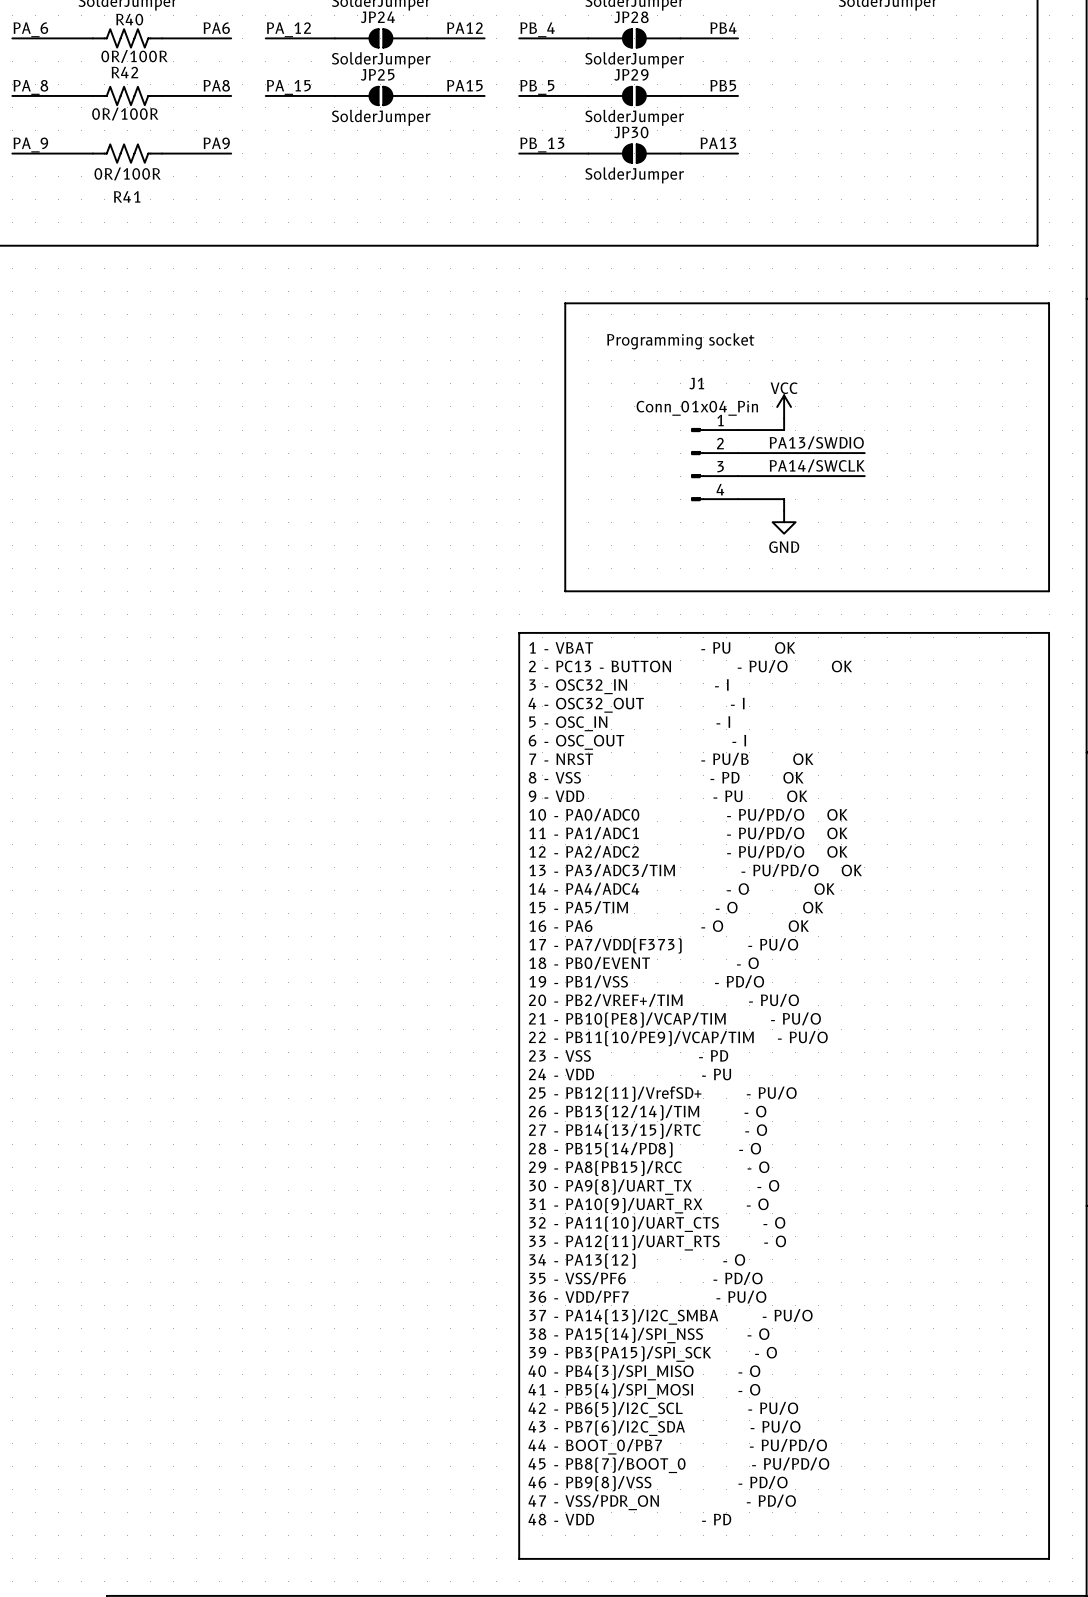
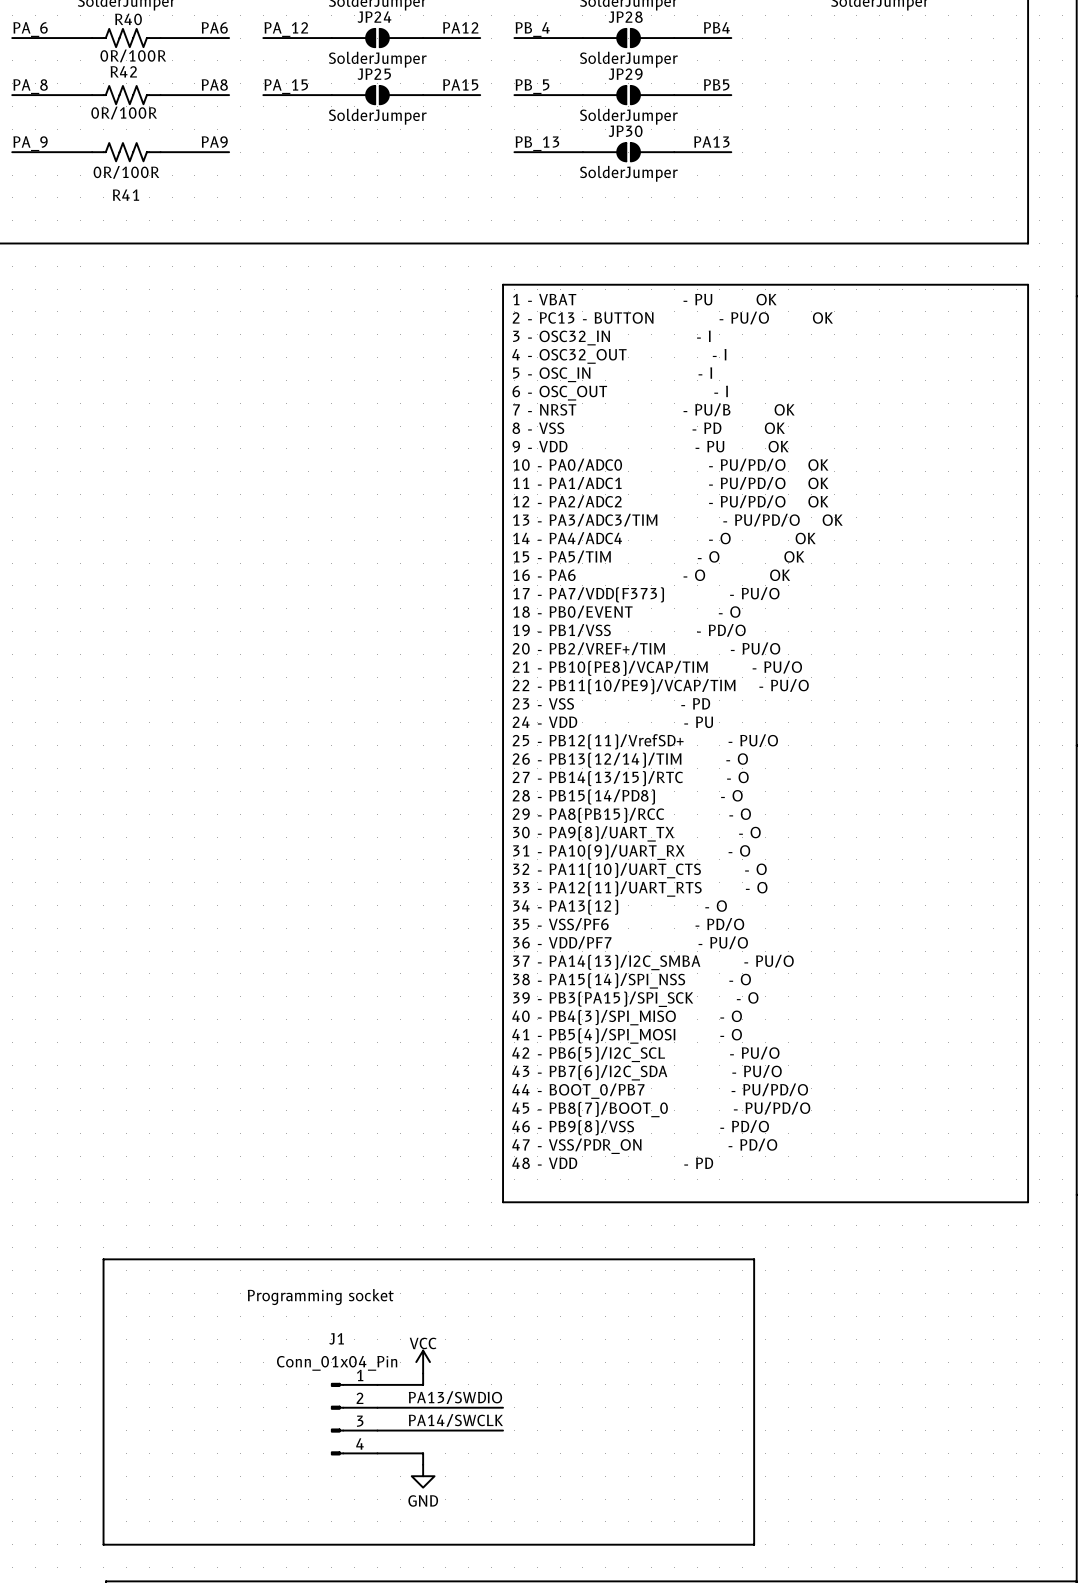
line: none -> (503, 284) (1028, 284) (1028, 1202) (503, 1202) (503, 284)
text: none -> 1 - VBAT - PU OK (644, 299)
line: (565, 303) (1049, 303) (1049, 591) (565, 591) (565, 303) -> none
text: none -> 2 - PC13 - BUTTON - PU/O OK (672, 318)
text: none -> 3 - OSC32_IN - I (611, 338)
text: Programming socket (680, 341) -> none
text: none -> 4 - OSC32_OUT - I (619, 356)
text: none -> 5 - OSC_IN - I (612, 374)
text: none -> 6 - OSC_OUT - I (620, 393)
power symbol: VCC (784, 406) -> none
text: none -> 7 - NRST - PU/B OK (653, 409)
wire: (784, 418) (784, 430) (738, 430) -> none
text: none -> 8 - VSS - PD OK (648, 428)
label: PA13/SWDIO (816, 442) -> none
text: none -> 9 - VDD - PU OK (650, 446)
wire: (738, 453) (864, 453) -> none
J1 position: (714, 464) -> (354, 1419)
label: PA14/SWCLK (817, 465) -> none
text: none -> 10 - PA0/ADC0 - PU/PD/O OK (670, 465)
wire: (738, 476) (864, 476) -> none
text: none -> 11 - PA1/ADC1 - PU/PD/O OK (670, 483)
wire: (738, 499) (784, 499) (784, 510) -> none
text: none -> 12 - PA2/ADC2 - PU/PD/O OK (670, 501)
power symbol: GND (784, 522) -> none
text: none -> 13 - PA3/ADC3/TIM - PU/PD/O OK (677, 520)
text: none -> 14 - PA4/ADC4 - O OK (664, 538)
text: none -> 15 - PA5/TIM - O OK (658, 556)
text: none -> 16 - PA6 - O OK (651, 575)
text: none -> 17 - PA7/VDD(F373) - PU/O (646, 594)
text: none -> 18 - PB0/EVENT - O (626, 612)
text: 1 - VBAT - PU OK (662, 647) -> 19 - PB1/VSS - PD/O (629, 630)
text: 2 - PC13 - BUTTON - PU/O OK (690, 666) -> 20 - PB2/VREF+/TIM - PU/O (646, 648)
text: none -> 21 - PB10(PE8)/VCAP/TIM - PU/O (657, 668)
text: 3 - OSC32_IN - I (628, 686) -> none
text: none -> 22 - PB11(10/PE9)/VCAP/TIM - PU/O (660, 686)
text: 4 - OSC32_OUT - I (636, 705) -> none
text: none -> 23 - VSS - PD (611, 703)
text: 5 - OSC_IN - I (629, 723) -> none
text: none -> 24 - VDD - PU (612, 722)
text: 6 - OSC_OUT - I (637, 742) -> none
text: none -> 25 - PB12(11)/VrefSD+ - PU/O (645, 741)
text: 7 - NRST - PU/B OK (671, 759) -> none
text: none -> 26 - PB13(12/14)/TIM - O (630, 760)
text: 8 - VSS - PD OK (666, 777) -> none
text: none -> 27 - PB14(13/15)/RTC - O (630, 778)
text: 9 - VDD - PU OK (668, 796) -> none
text: none -> 28 - PB15(14/PD8) - O (627, 796)
text: 10 - PA0/ADC0 - PU/PD/O OK (688, 814) -> none
text: none -> 29 - PA8(PB15)/RCC - O (631, 815)
text: 11 - PA1/ADC1 - PU/PD/O OK (688, 833) -> none
text: none -> 30 - PA9(8)/UART_TX - O (636, 833)
text: 12 - PA2/ADC2 - PU/PD/O OK (688, 851) -> none
text: none -> 31 - PA10(9)/UART_RX - O (631, 852)
text: 13 - PA3/ADC3/TIM - PU/PD/O OK (695, 870) -> none
text: none -> 32 - PA11(10)/UART_CTS - O (639, 870)
text: 14 - PA4/ADC4 - O OK (681, 889) -> none
text: none -> 33 - PA12(11)/UART_RTS - O (640, 889)
text: 15 - PA5/TIM - O OK (676, 907) -> none
text: none -> 34 - PA13(12) - O (620, 907)
text: 16 - PA6 - O OK (669, 926) -> none
text: none -> 35 - VSS/PF6 - PD/O (628, 924)
text: 17 - PA7/VDD(F373) - PU/O (663, 945) -> none
text: none -> 36 - VDD/PF7 - PU/O (630, 942)
text: 18 - PB0/EVENT - O (644, 963) -> none
text: none -> 37 - PA14(13)/I2C_SMBA - PU/O (653, 962)
text: 19 - PB1/VSS - PD/O (646, 981) -> none
text: none -> 38 - PA15(14)/SPI_NSS - O (632, 980)
text: 20 - PB2/VREF+/TIM - PU/O (663, 1000) -> none
text: none -> 39 - PB3(PA15)/SPI_SCK - O (635, 999)
text: 21 - PB10(PE8)/VCAP/TIM - PU/O (674, 1020) -> 40 - PB4(3)/SPI_MISO - O (627, 1017)
text: 22 - PB11(10/PE9)/VCAP/TIM - PU/O (678, 1038) -> none
text: none -> 41 - PB5(4)/SPI_MOSI - O (627, 1036)
text: 23 - VSS - PD (628, 1055) -> none
text: none -> 42 - PB6(5)/I2C_SCL - PU/O (645, 1054)
text: 24 - VDD - PU (630, 1074) -> none
text: none -> 43 - PB7(6)/I2C_SDA - PU/O (647, 1072)
text: 25 - PB12(11)/VrefSD+ - PU/O (662, 1094) -> none
text: none -> 44 - BOOT_0/PB7 - PU/PD/O (660, 1091)
text: 26 - PB13(12/14)/TIM - O (647, 1112) -> none
text: none -> 45 - PB8(7)/BOOT_0 - PU/PD/O (661, 1109)
text: 27 - PB14(13/15)/RTC - O (648, 1131) -> none
text: none -> 46 - PB9(8)/VSS - PD/O (640, 1127)
text: 28 - PB15(14/PD8) - O (645, 1149) -> none
text: none -> 47 - VSS/PDR_ON - PD/O (644, 1146)
text: 29 - PA8(PB15)/RCC - O (649, 1168) -> none
text: none -> 48 - VDD - PD (612, 1163)
text: 30 - PA9(8)/UART_TX - O (654, 1187) -> none
text: 31 - PA10(9)/UART_RX - O (648, 1205) -> none
text: 32 - PA11(10)/UART_CTS - O (657, 1224) -> none
text: 33 - PA12(11)/UART_RTS - O (657, 1242) -> none
text: 34 - PA13(12) - O (637, 1261) -> none
text: 35 - VSS/PF6 - PD/O (645, 1278) -> none
text: 36 - VDD/PF7 - PU/O (647, 1297) -> none
text: none -> Programming socket (320, 1297)
text: 37 - PA14(13)/I2C_SMBA - PU/O (670, 1316) -> none
text: 38 - PA15(14)/SPI_NSS - O (649, 1335) -> none
text: 39 - PB3(PA15)/SPI_SCK - O (653, 1354) -> none
text: 40 - PB4(3)/SPI_MISO - O (644, 1372) -> none
power symbol: none -> VCC (423, 1362)
wire: none -> (423, 1373) (423, 1384) (377, 1384)
text: 41 - PB5(4)/SPI_MOSI - O (644, 1391) -> none
text: 42 - PB6(5)/I2C_SCL - PU/O (663, 1409) -> none
label: none -> PA13/SWDIO (455, 1397)
wire: none -> (377, 1407) (503, 1407)
text: 43 - PB7(6)/I2C_SDA - PU/O (664, 1428) -> none
label: none -> PA14/SWCLK (455, 1420)
wire: none -> (377, 1430) (503, 1430)
text: 44 - BOOT_0/PB7 - PU/PD/O (677, 1446) -> none
text: 45 - PB8(7)/BOOT_0 - PU/PD/O (678, 1465) -> none
wire: none -> (377, 1453) (423, 1453) (423, 1464)
text: 46 - PB9(8)/VSS - PD/O (658, 1483) -> none
power symbol: none -> GND (423, 1476)
text: 47 - VSS/PDR_ON - PD/O (662, 1502) -> none
text: 48 - VDD - PD (629, 1519) -> none
line: (519, 1558) (519, 632) (1049, 632) (1049, 1558) (761, 1558) -> (514, 1544) (103, 1544) (103, 1259) (754, 1259) (754, 1544)

